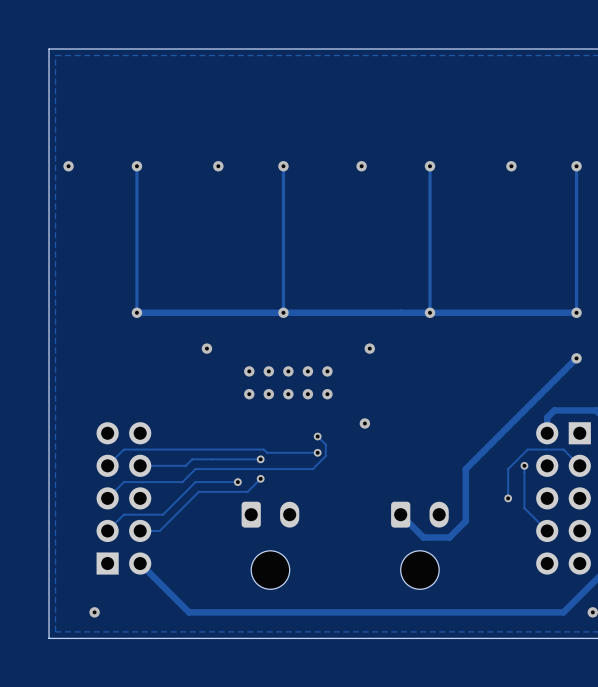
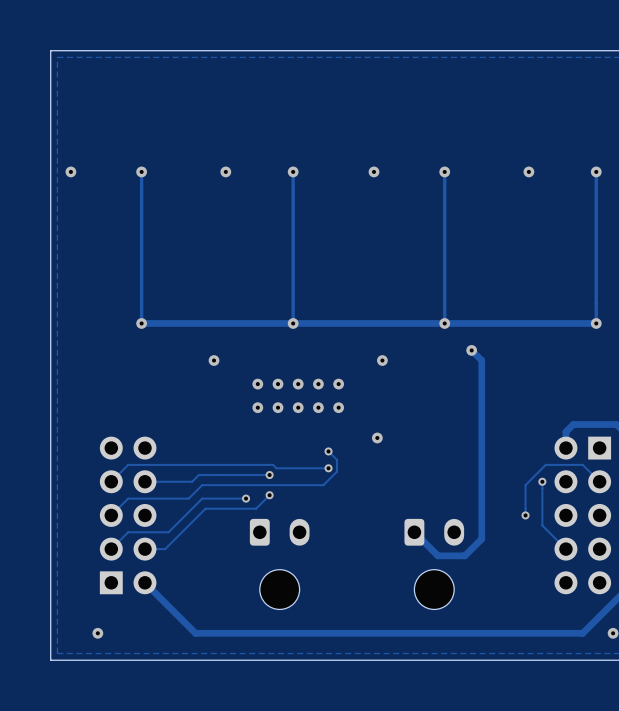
via: none -> (471, 350)
track: (576, 358) (465, 469) -> (471, 350) (481, 360) (481, 485)
via: (576, 358) -> none

